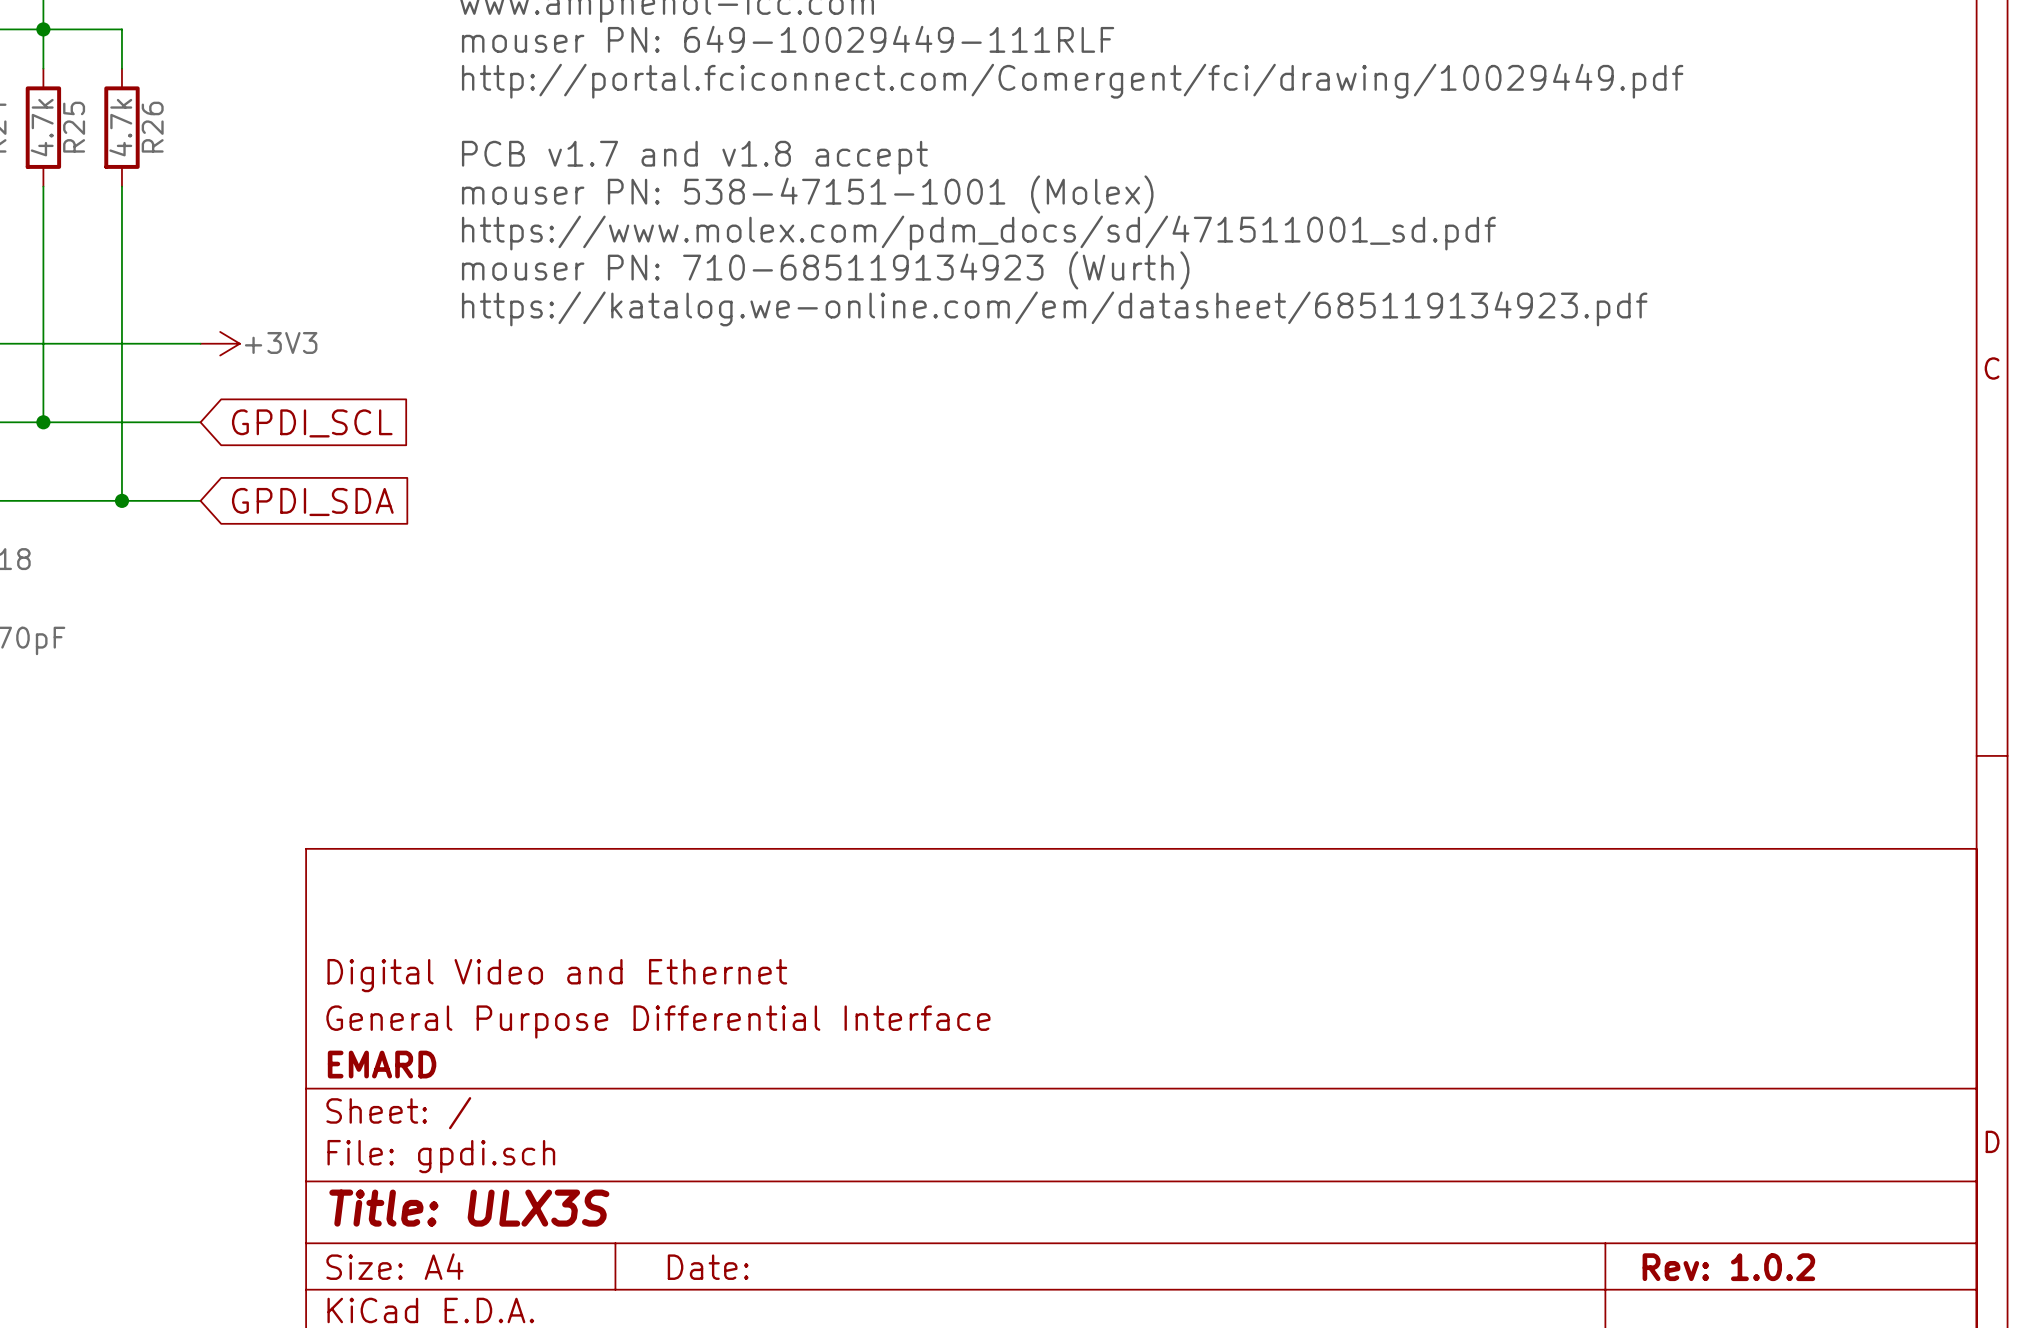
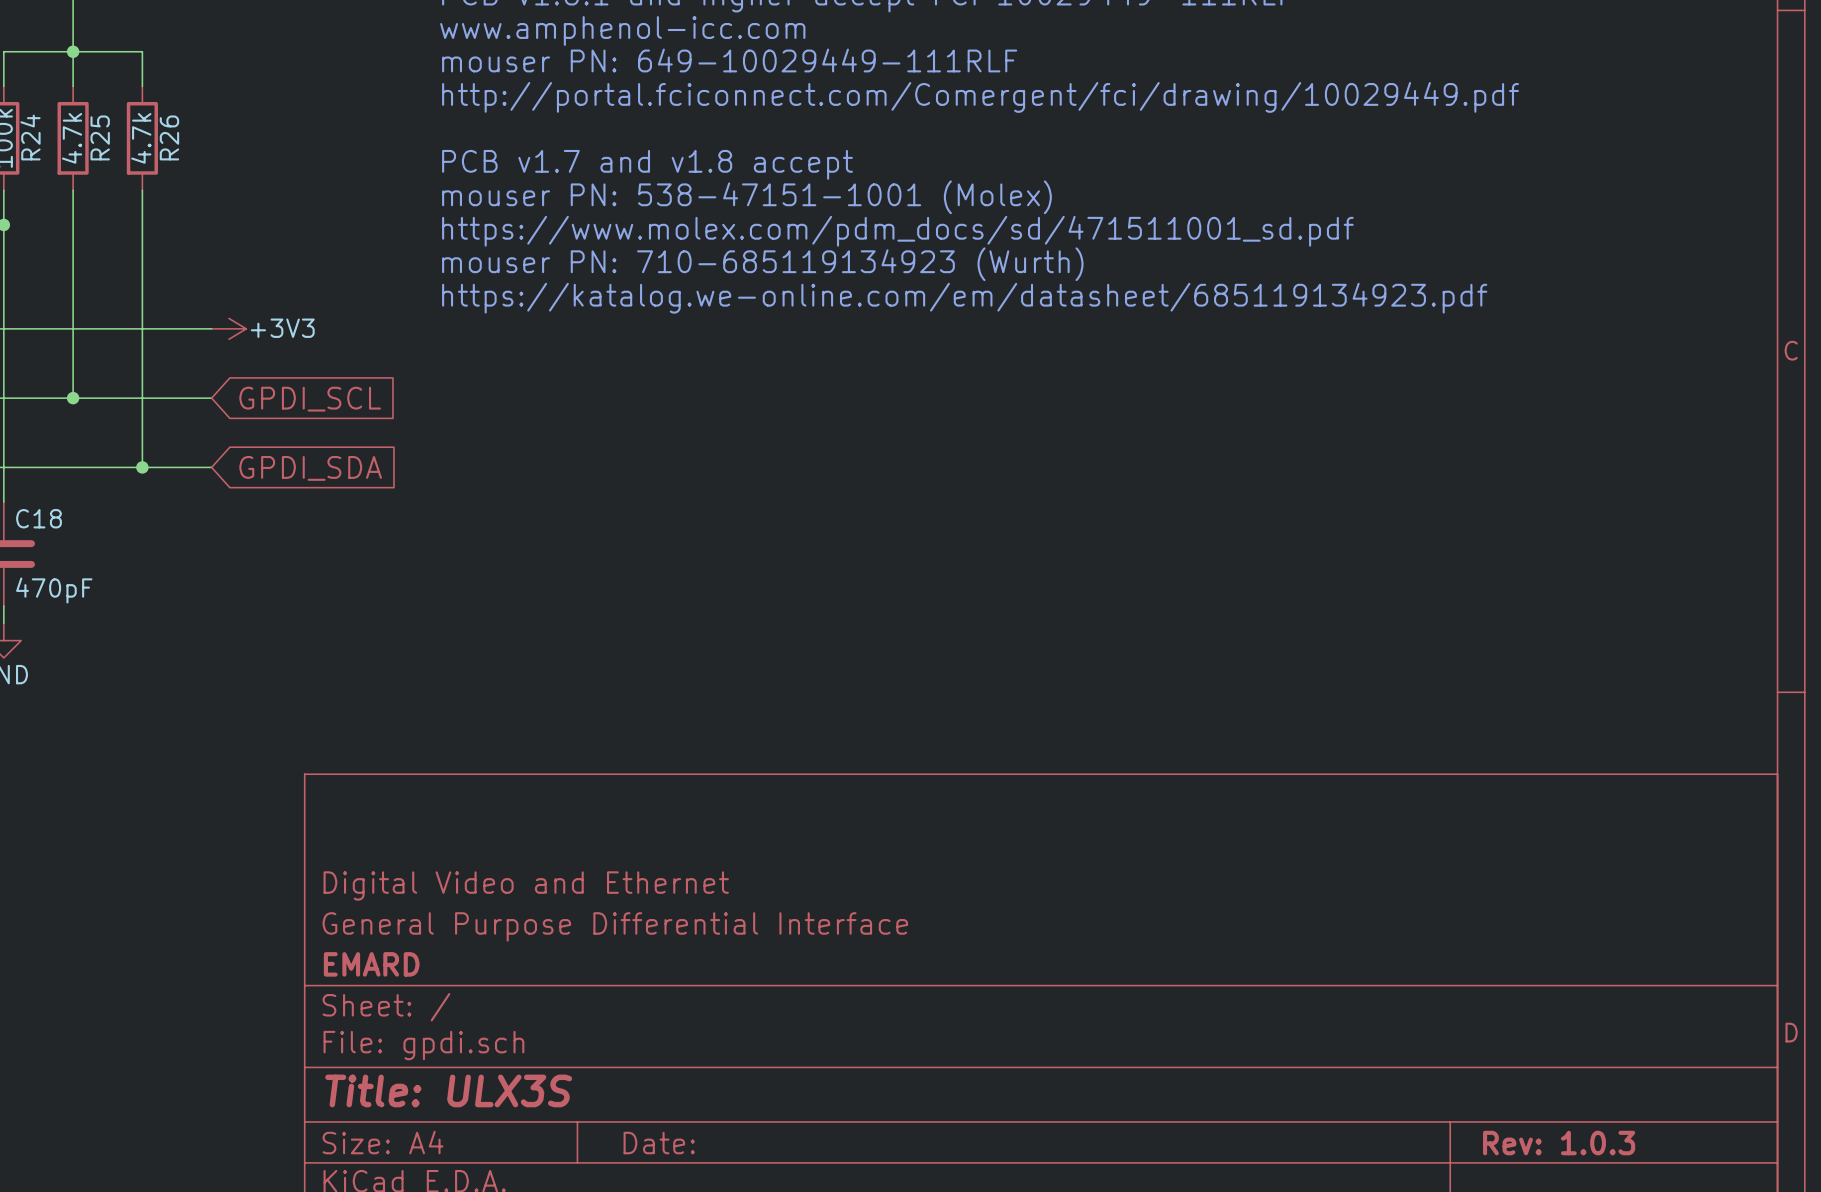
title block: Rev: 1.0.2 (1728, 1267) -> Rev: 1.0.3 (1559, 1143)

